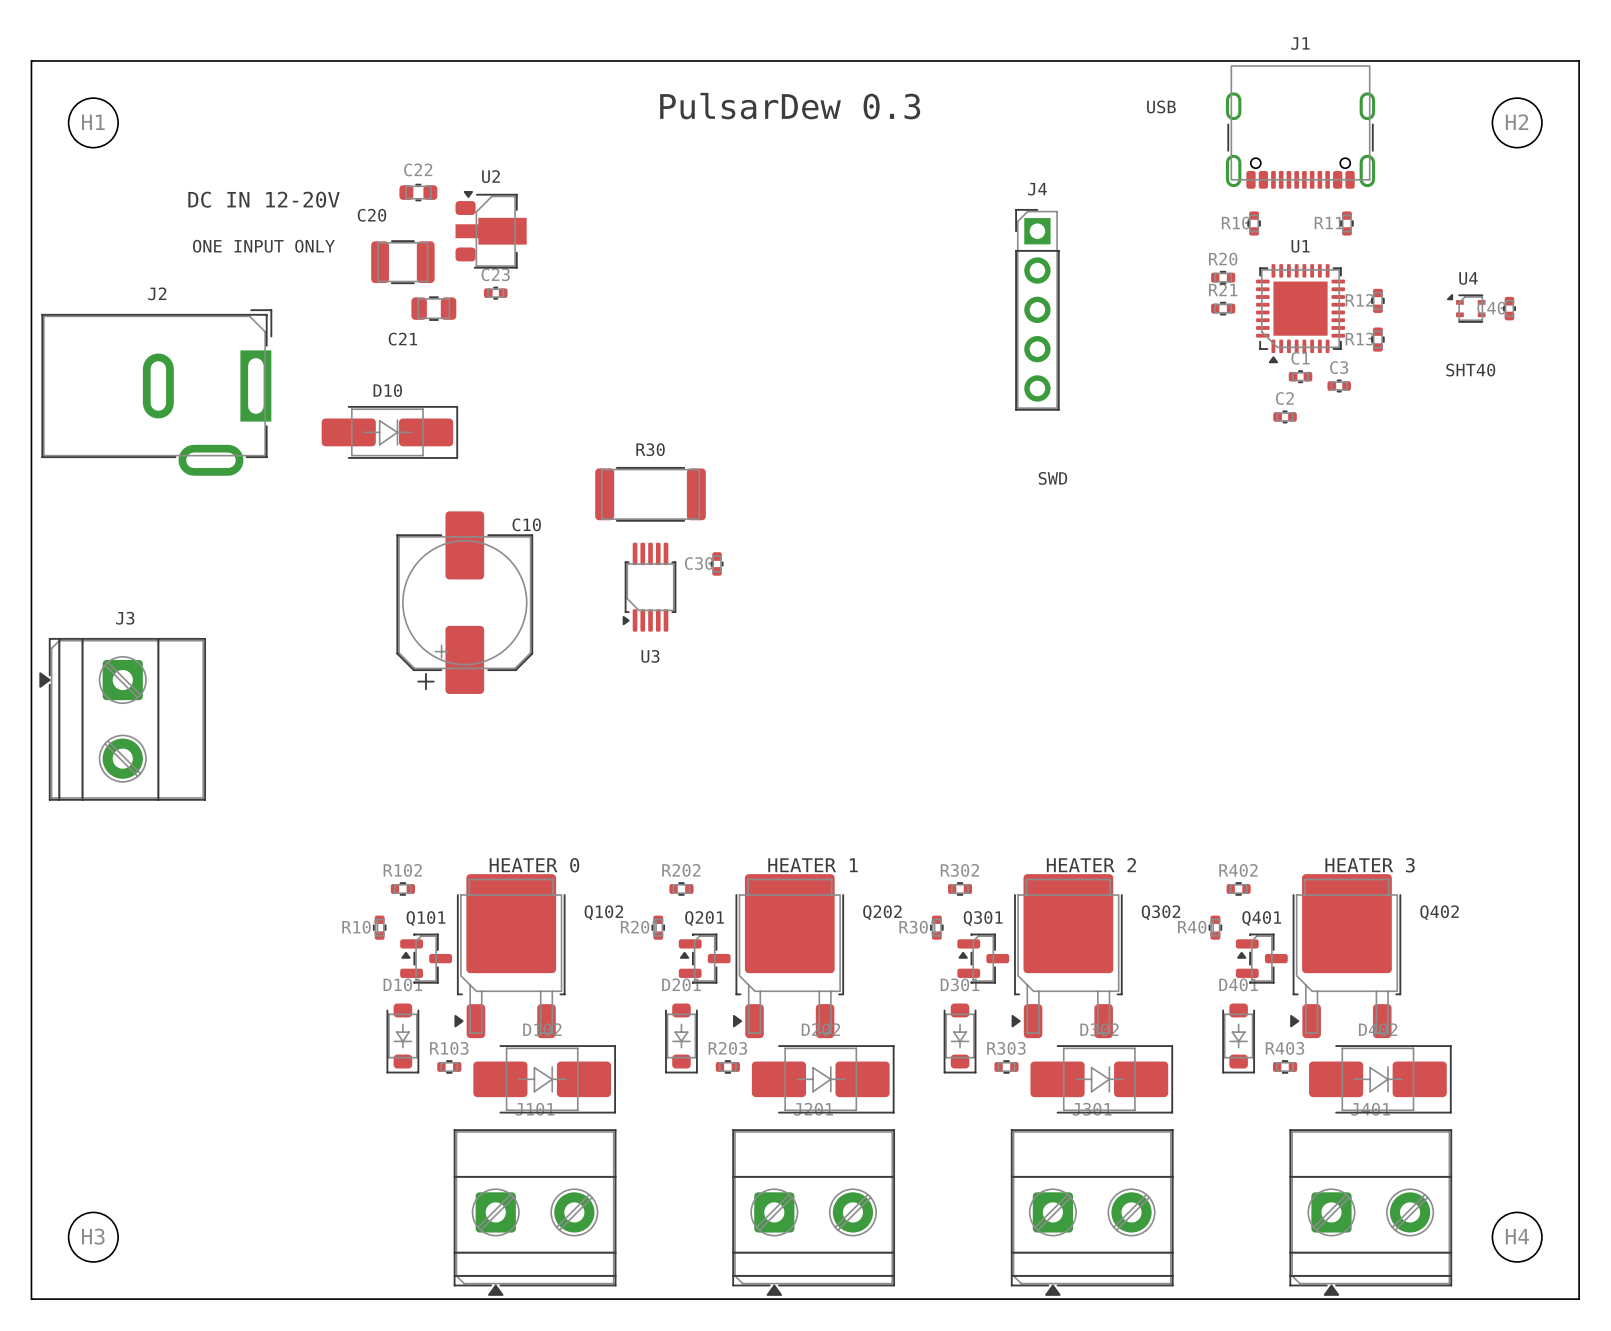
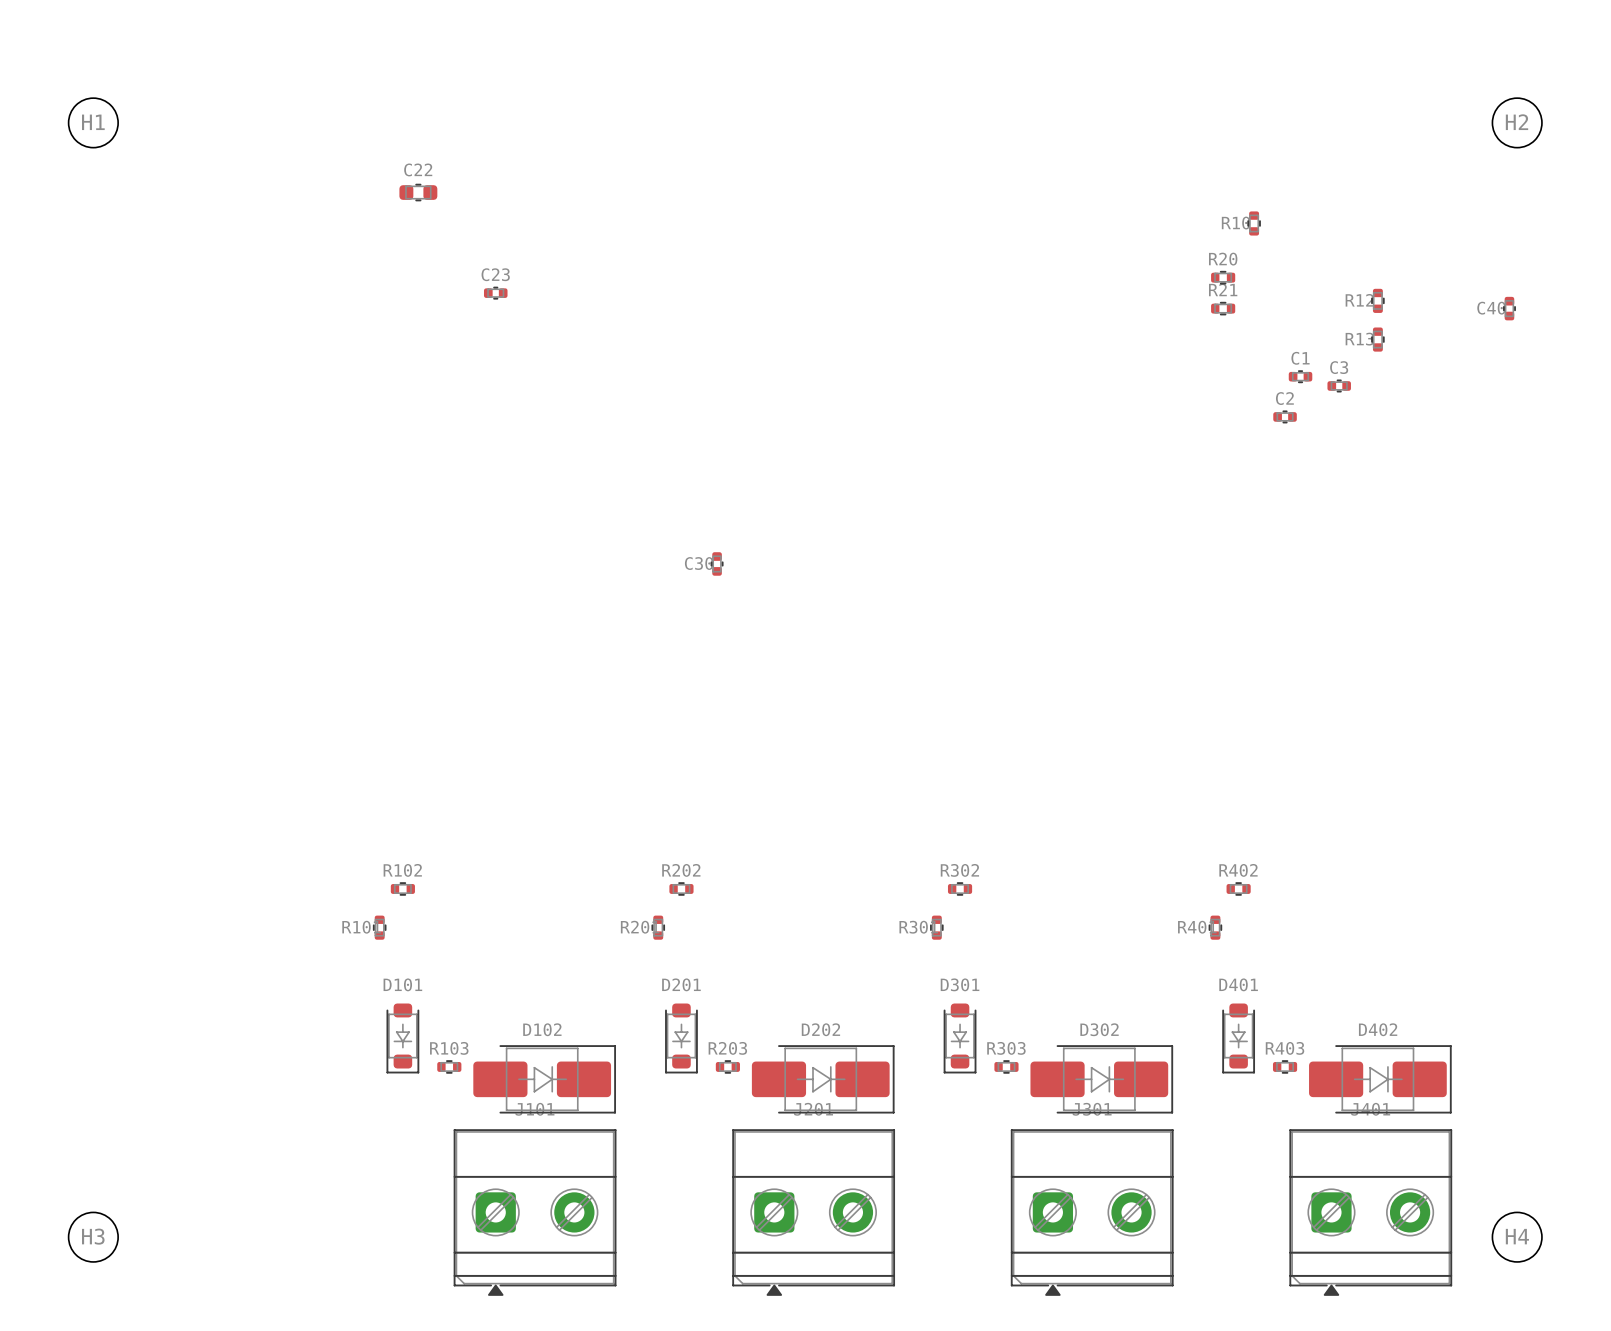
board edge: (31, 60) (1579, 60) (1579, 1299) (31, 1299) (31, 60) -> none
text: PulsarDew 0.3 (790, 106) -> none
text: USB (1161, 106) -> none
J1: (1300, 126) -> none
text: DC IN 12-20V (264, 199) -> none
R11: (1346, 223) -> none
U2: (491, 229) -> none
text: ONE INPUT ONLY (263, 246) -> none
C20: (402, 262) -> none
C21: (433, 308) -> none
U4: (1466, 308) -> none
J4: (1037, 309) -> none
U1: (1300, 313) -> none
text: SHT40 (1470, 370) -> none
J2: (156, 392) -> none
D10: (389, 432) -> none
text: SWD (1052, 478) -> none
R30: (650, 494) -> none
U3: (649, 587) -> none
C10: (464, 602) -> none
J3: (122, 719) -> none
text: HEATER 0 (534, 865) -> none
text: HEATER 1 (813, 865) -> none
text: HEATER 2 (1091, 865) -> none
text: HEATER 3 (1370, 865) -> none
Q102: (509, 956) -> none
Q202: (788, 956) -> none
Q302: (1067, 956) -> none
Q402: (1345, 956) -> none
Q101: (426, 958) -> none
Q201: (704, 958) -> none
Q301: (983, 958) -> none
Q401: (1261, 958) -> none

